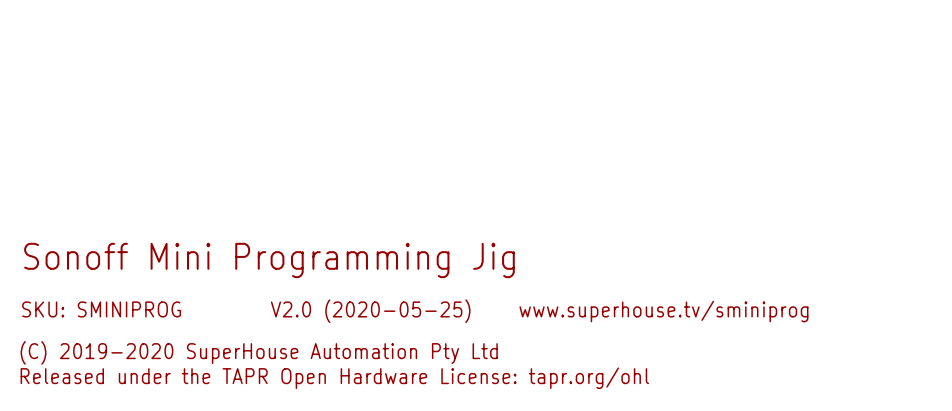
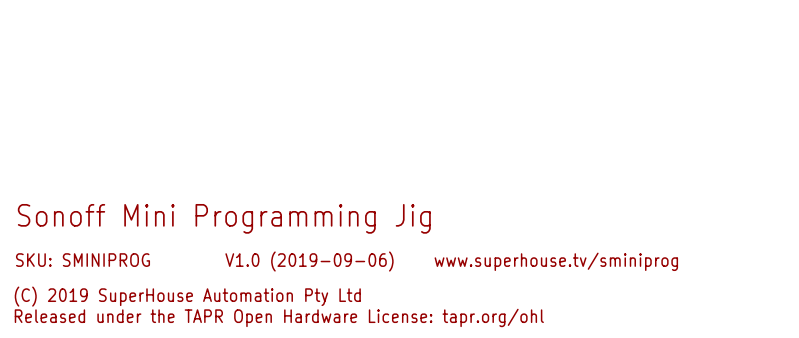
text: V2.0 (2020-05-25) (370, 311) -> V1.0 (2019-09-06) (309, 261)
text: (C) 2019-2020 SuperHouse Automation Pty Ltd (259, 352) -> (C) 2019 SuperHouse Automation Pty Ltd (187, 296)

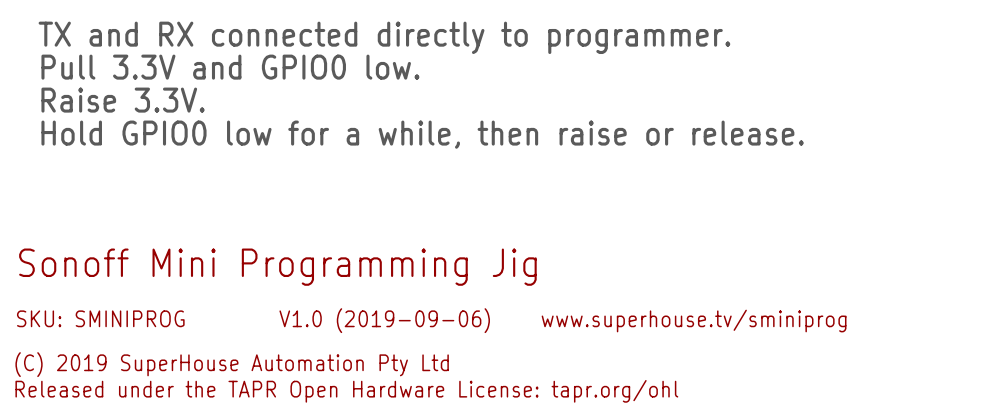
text: none -> TX and RX connected directly to programmer. (384, 37)
text: none -> Pull 3.3V and GPIO0 low. (230, 67)
text: none -> Raise 3.3V. (123, 100)
text: none -> Hold GPIO0 low for a while, then raise or release. (422, 134)

